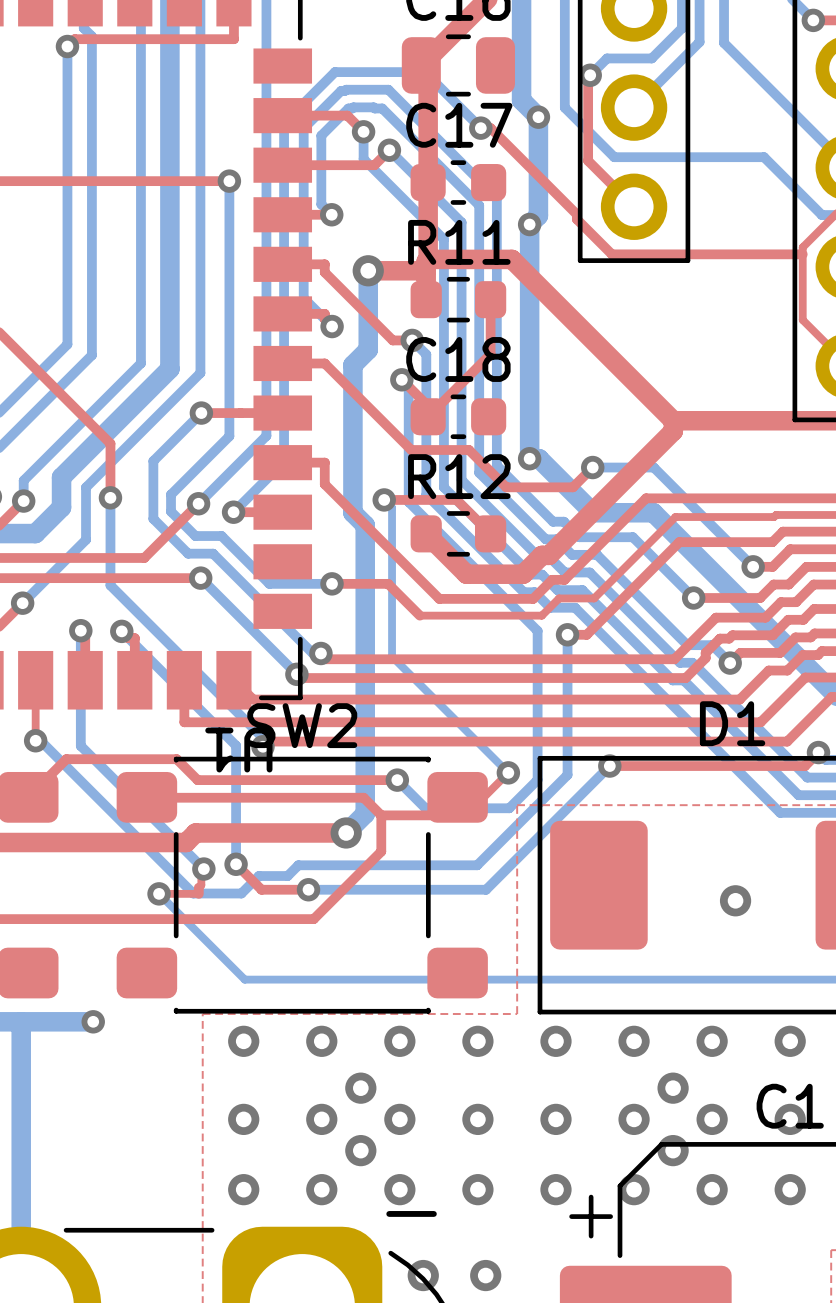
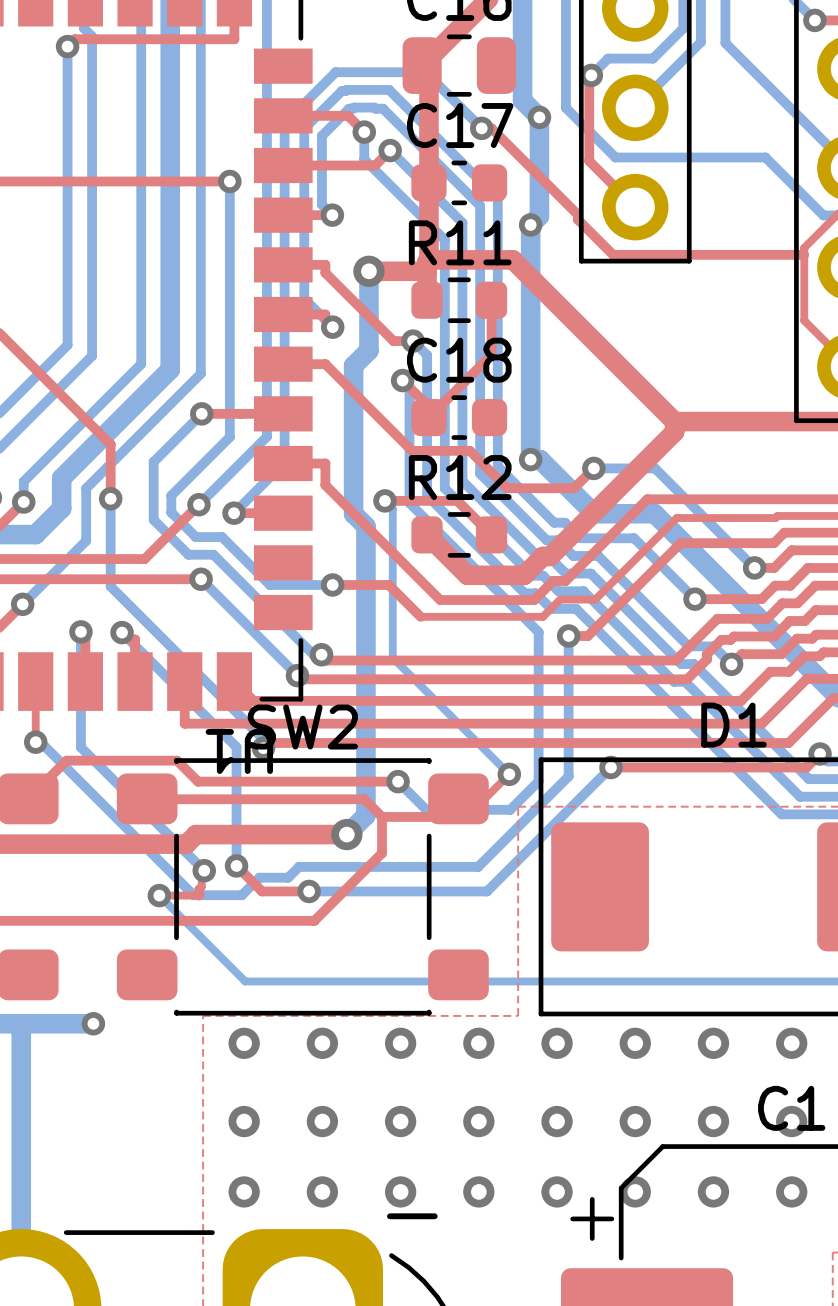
via: (735, 900) -> none
via: (360, 1088) -> none
via: (673, 1088) -> none
via: (360, 1150) -> none
via: (673, 1150) -> none
via: (423, 1275) -> none
via: (485, 1275) -> none

